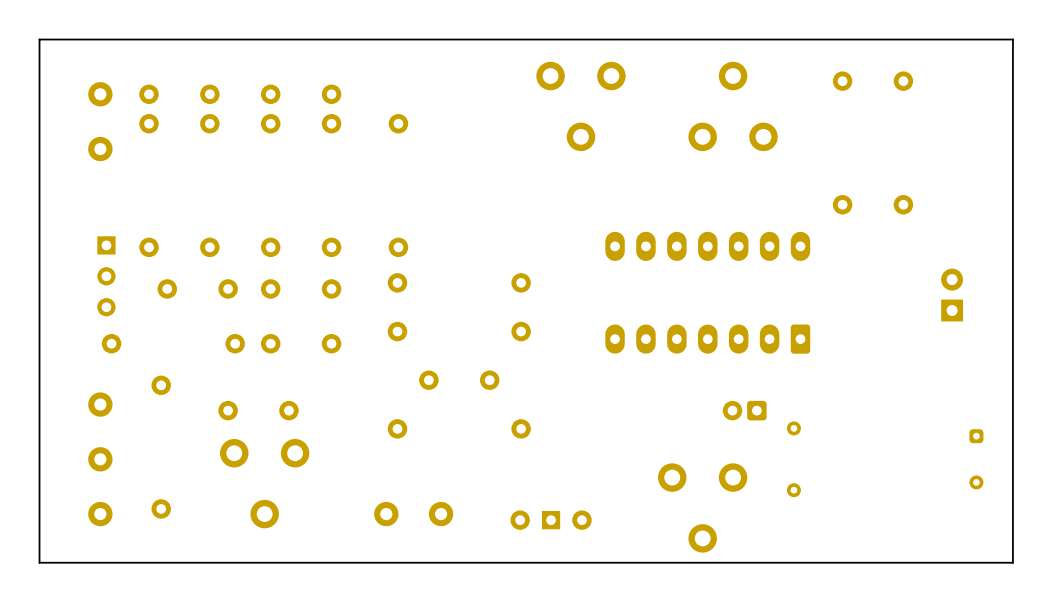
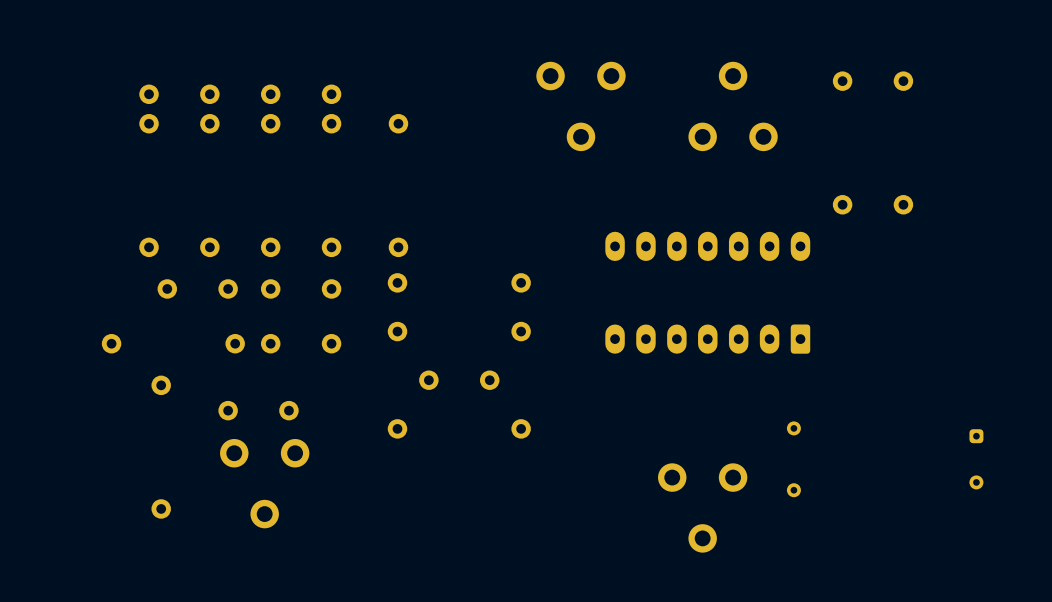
board edge: (1012, 39) (39, 39) (39, 562) (1012, 562) (1012, 39) -> none
part: (100, 94) -> none
part: (100, 149) -> none
part: (106, 276) -> none
part: (952, 295) -> none
part: (100, 404) -> none
part: (744, 410) -> none
part: (100, 459) -> none
part: (100, 514) -> none
part: (386, 514) -> none
part: (441, 514) -> none
part: (551, 520) -> none

